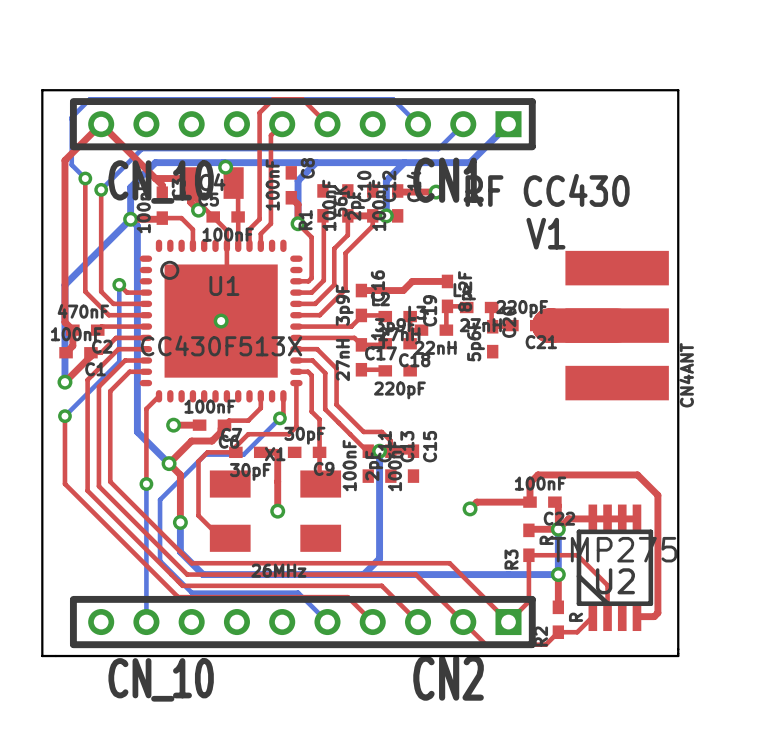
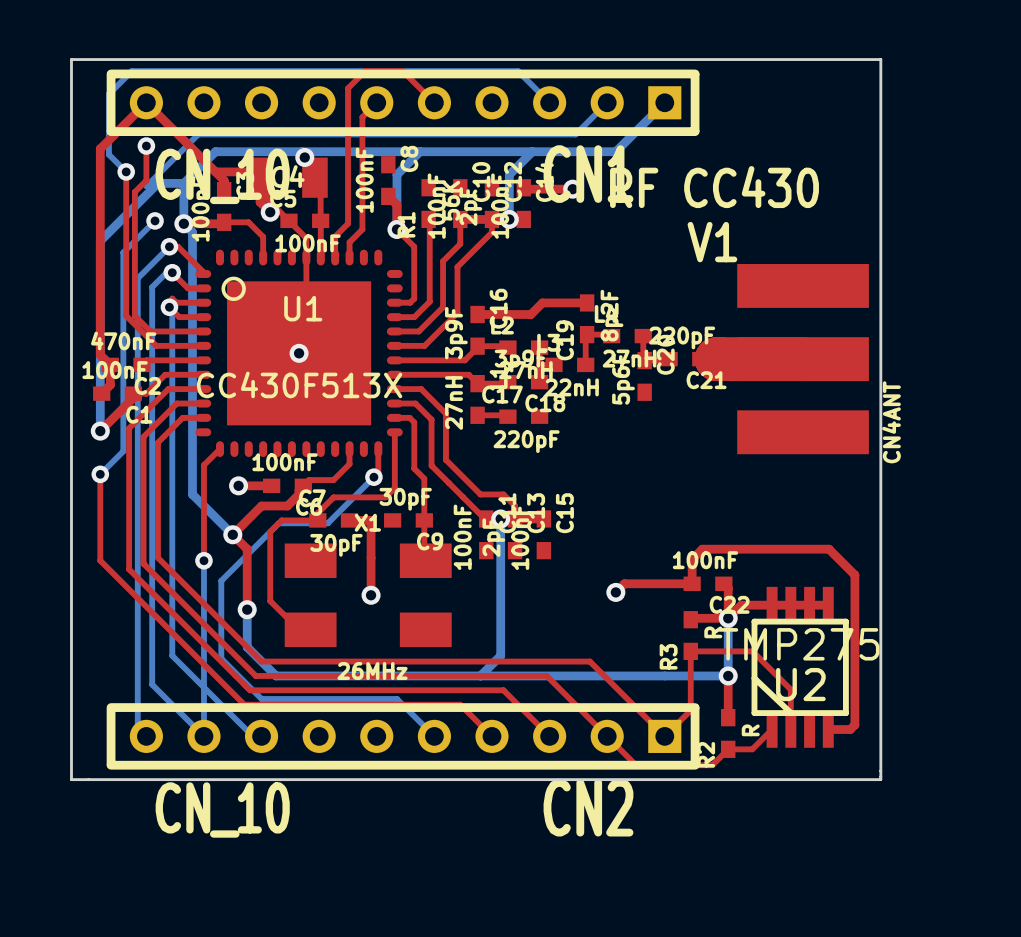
via: none -> (146, 146)
top track: (101, 189) (101, 291) (113, 303) -> (146, 146) (146, 180) (134, 192) (134, 315) (150, 331) (161, 331)
via: (101, 189) -> none
via: none -> (155, 220)
bottom track: (130, 219) (64, 284) -> (183, 183) (157, 183) (100, 241) (100, 307)
bottom track: none -> (169, 246) (137, 278) (137, 727) (146, 736)
top track: none -> (169, 246) (178, 246) (203, 273)
via: none -> (169, 246)
bottom track: none -> (172, 272) (166, 272) (152, 287) (152, 684) (203, 736)
top track: none -> (172, 272) (187, 288) (203, 288)
via: none -> (172, 272)
bottom track: none -> (172, 298) (172, 655) (252, 736) (261, 736)
top track: none -> (172, 298) (176, 302) (203, 302)
bottom track: (119, 284) (119, 361) (83, 398) -> (155, 220) (123, 252) (123, 451)

